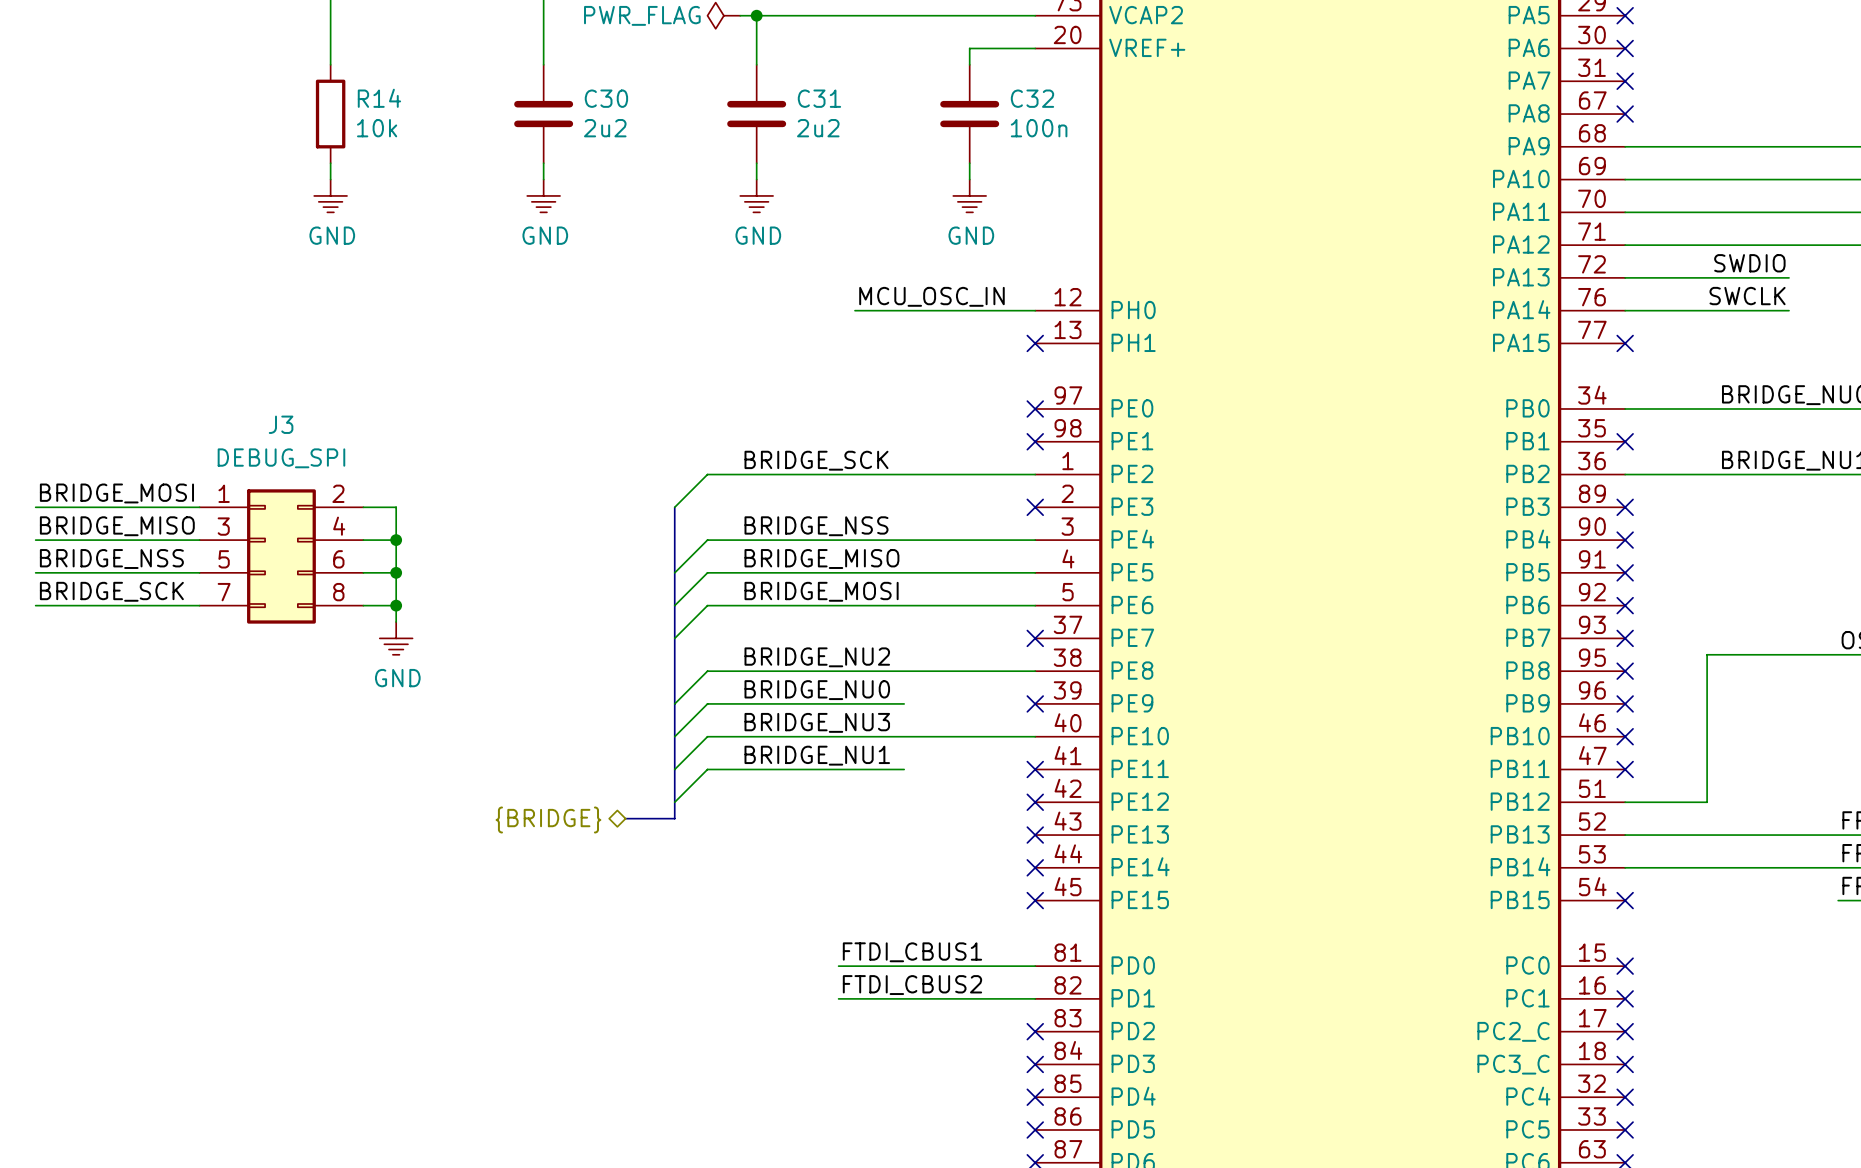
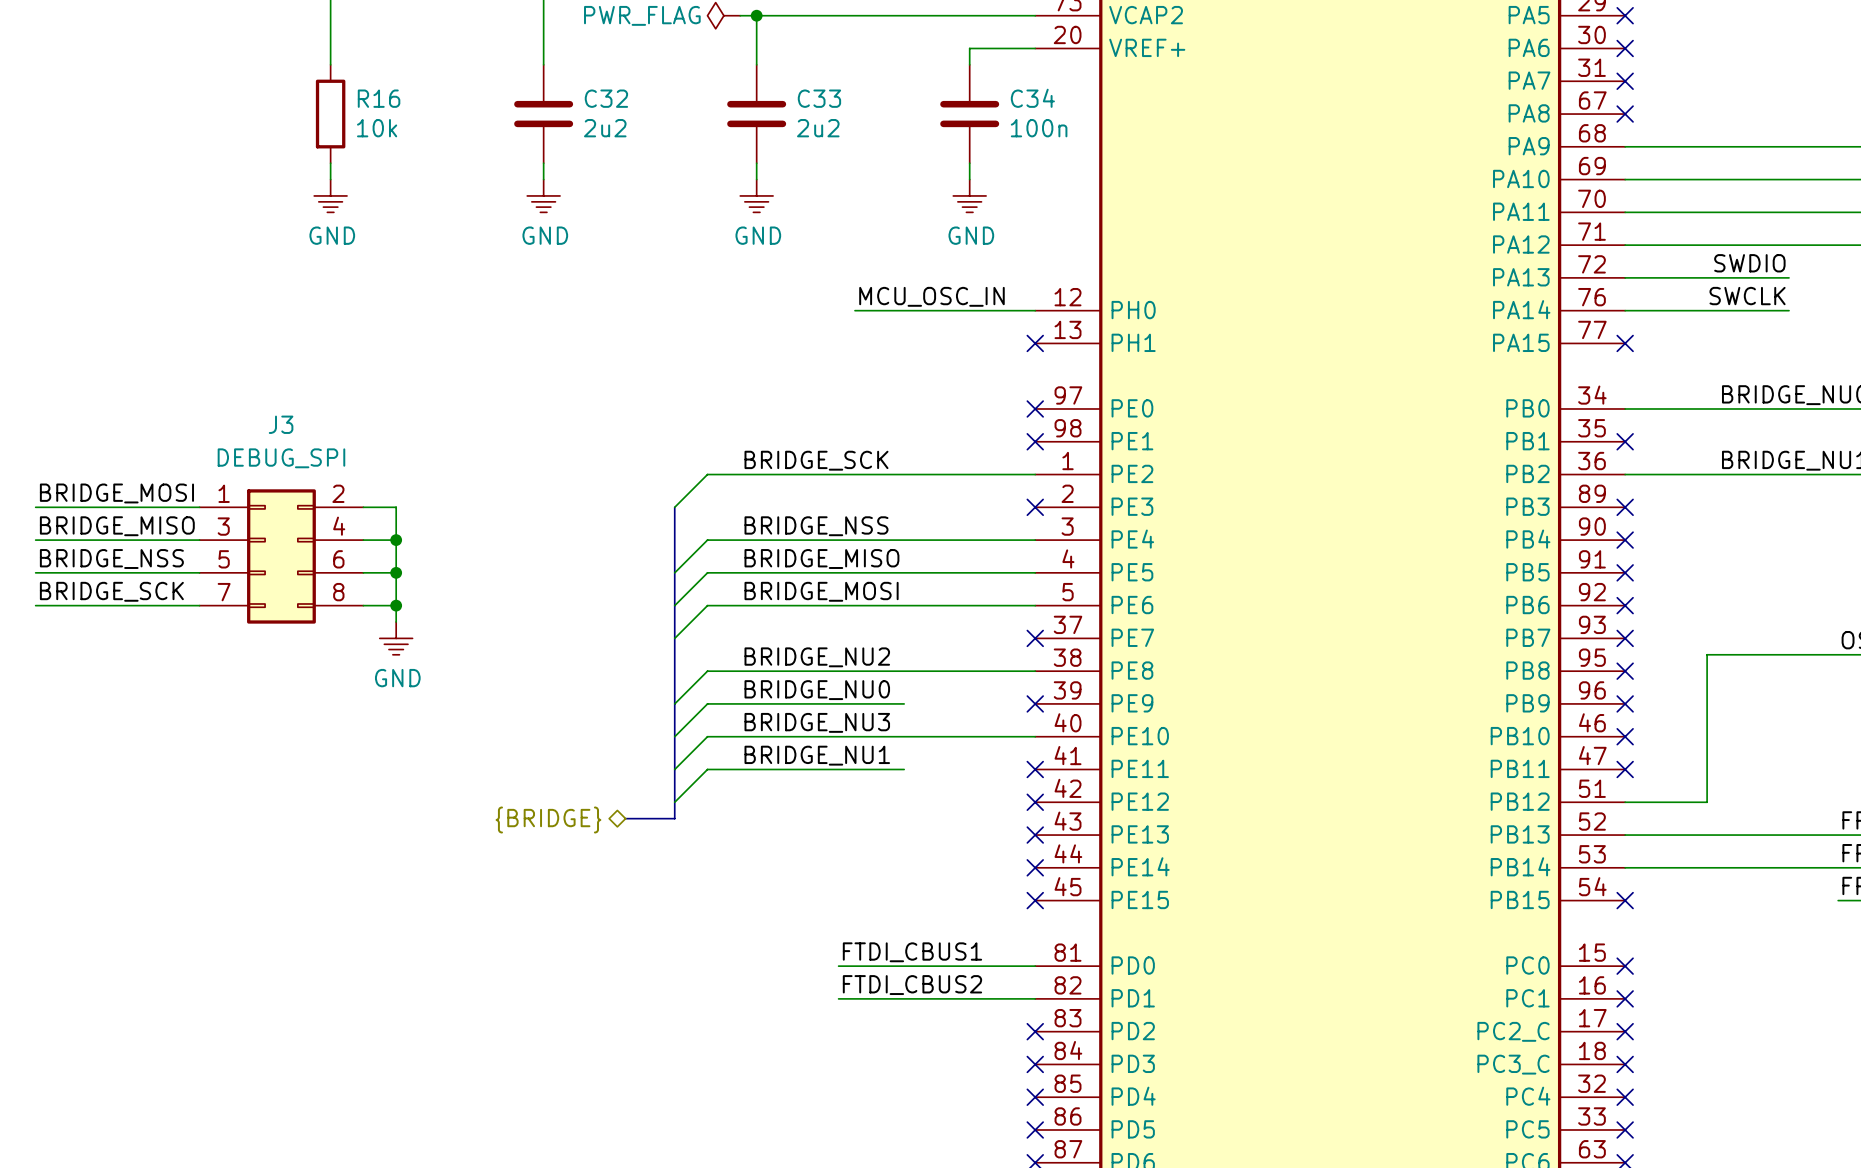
R14 name: R14 (379, 98) -> R16 (379, 98)
C30 name: C30 (606, 98) -> C32 (606, 98)
C31 name: C31 (819, 98) -> C33 (819, 98)
C32 name: C32 (1032, 98) -> C34 (1032, 98)

